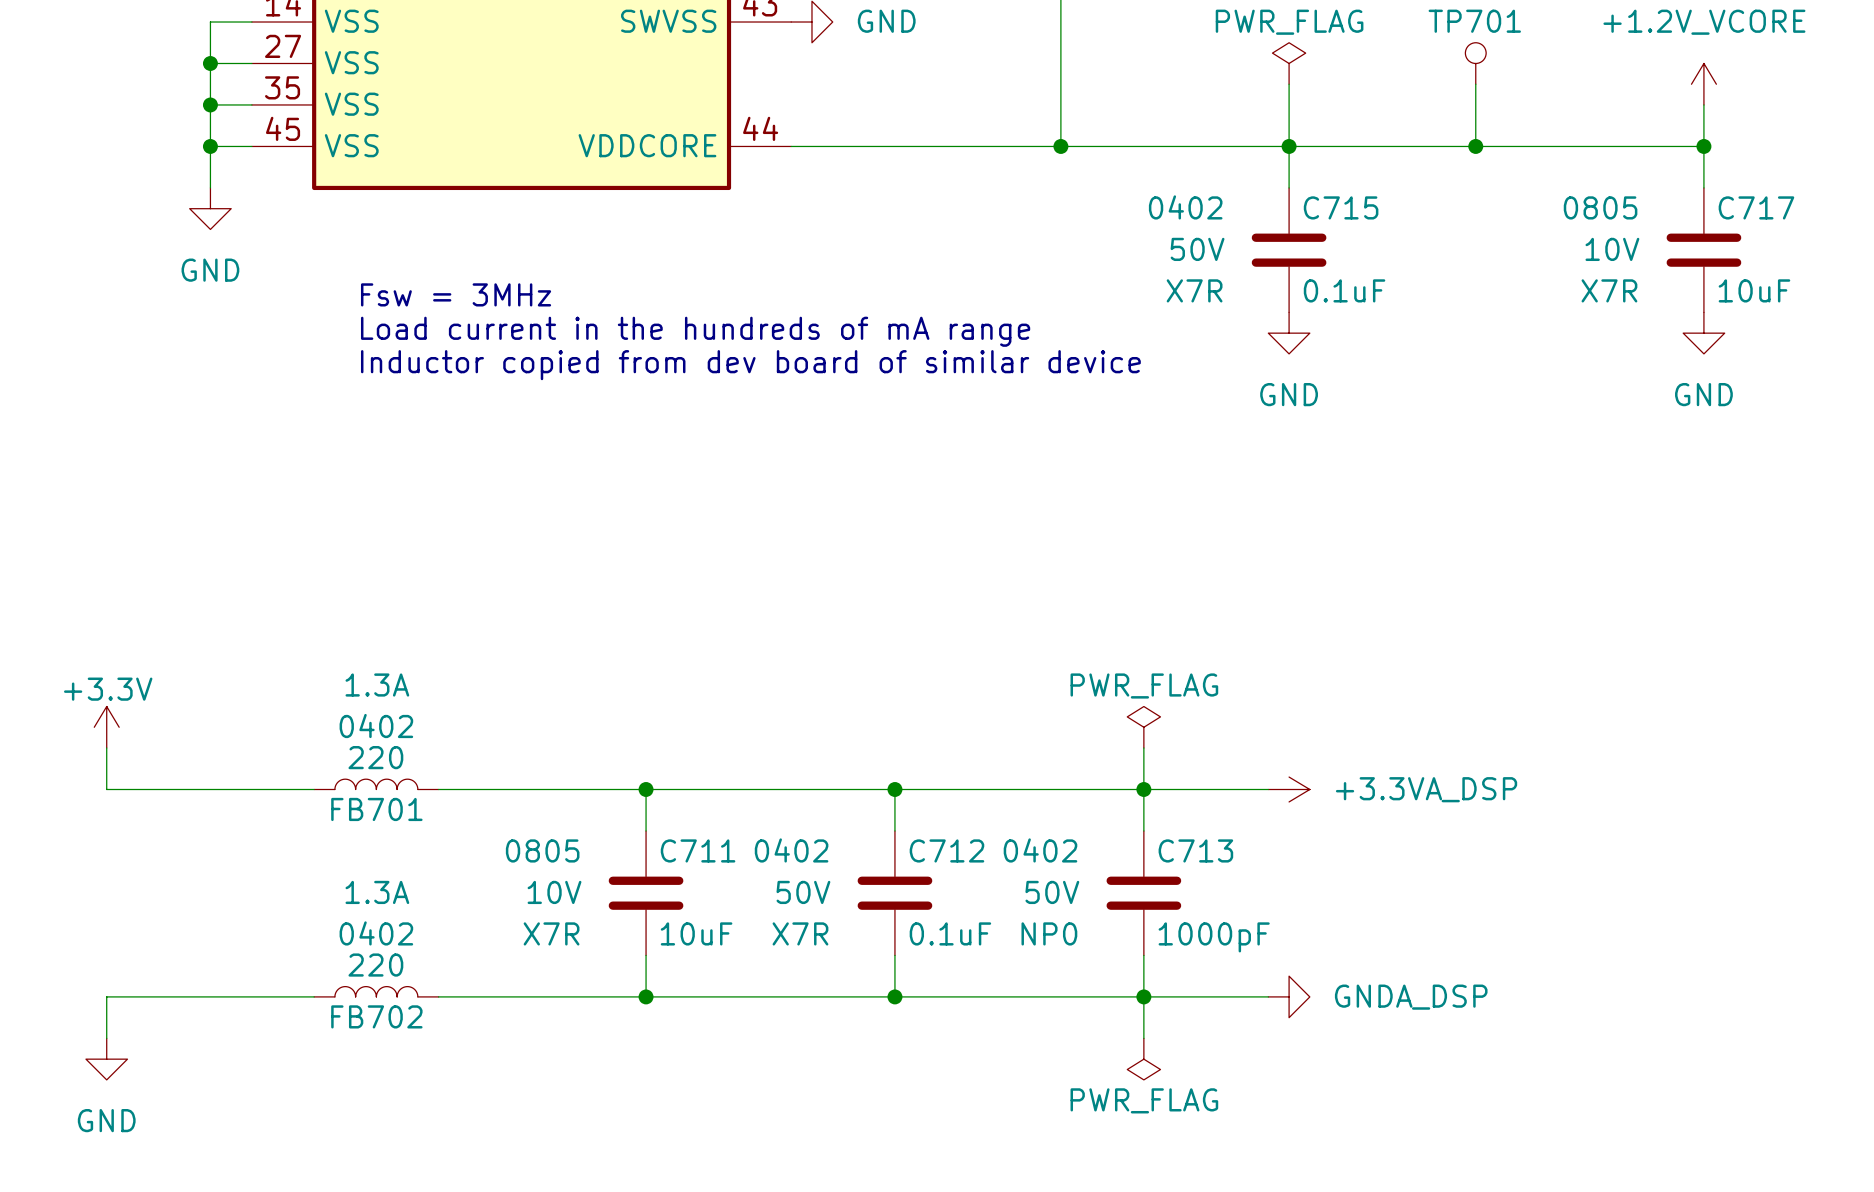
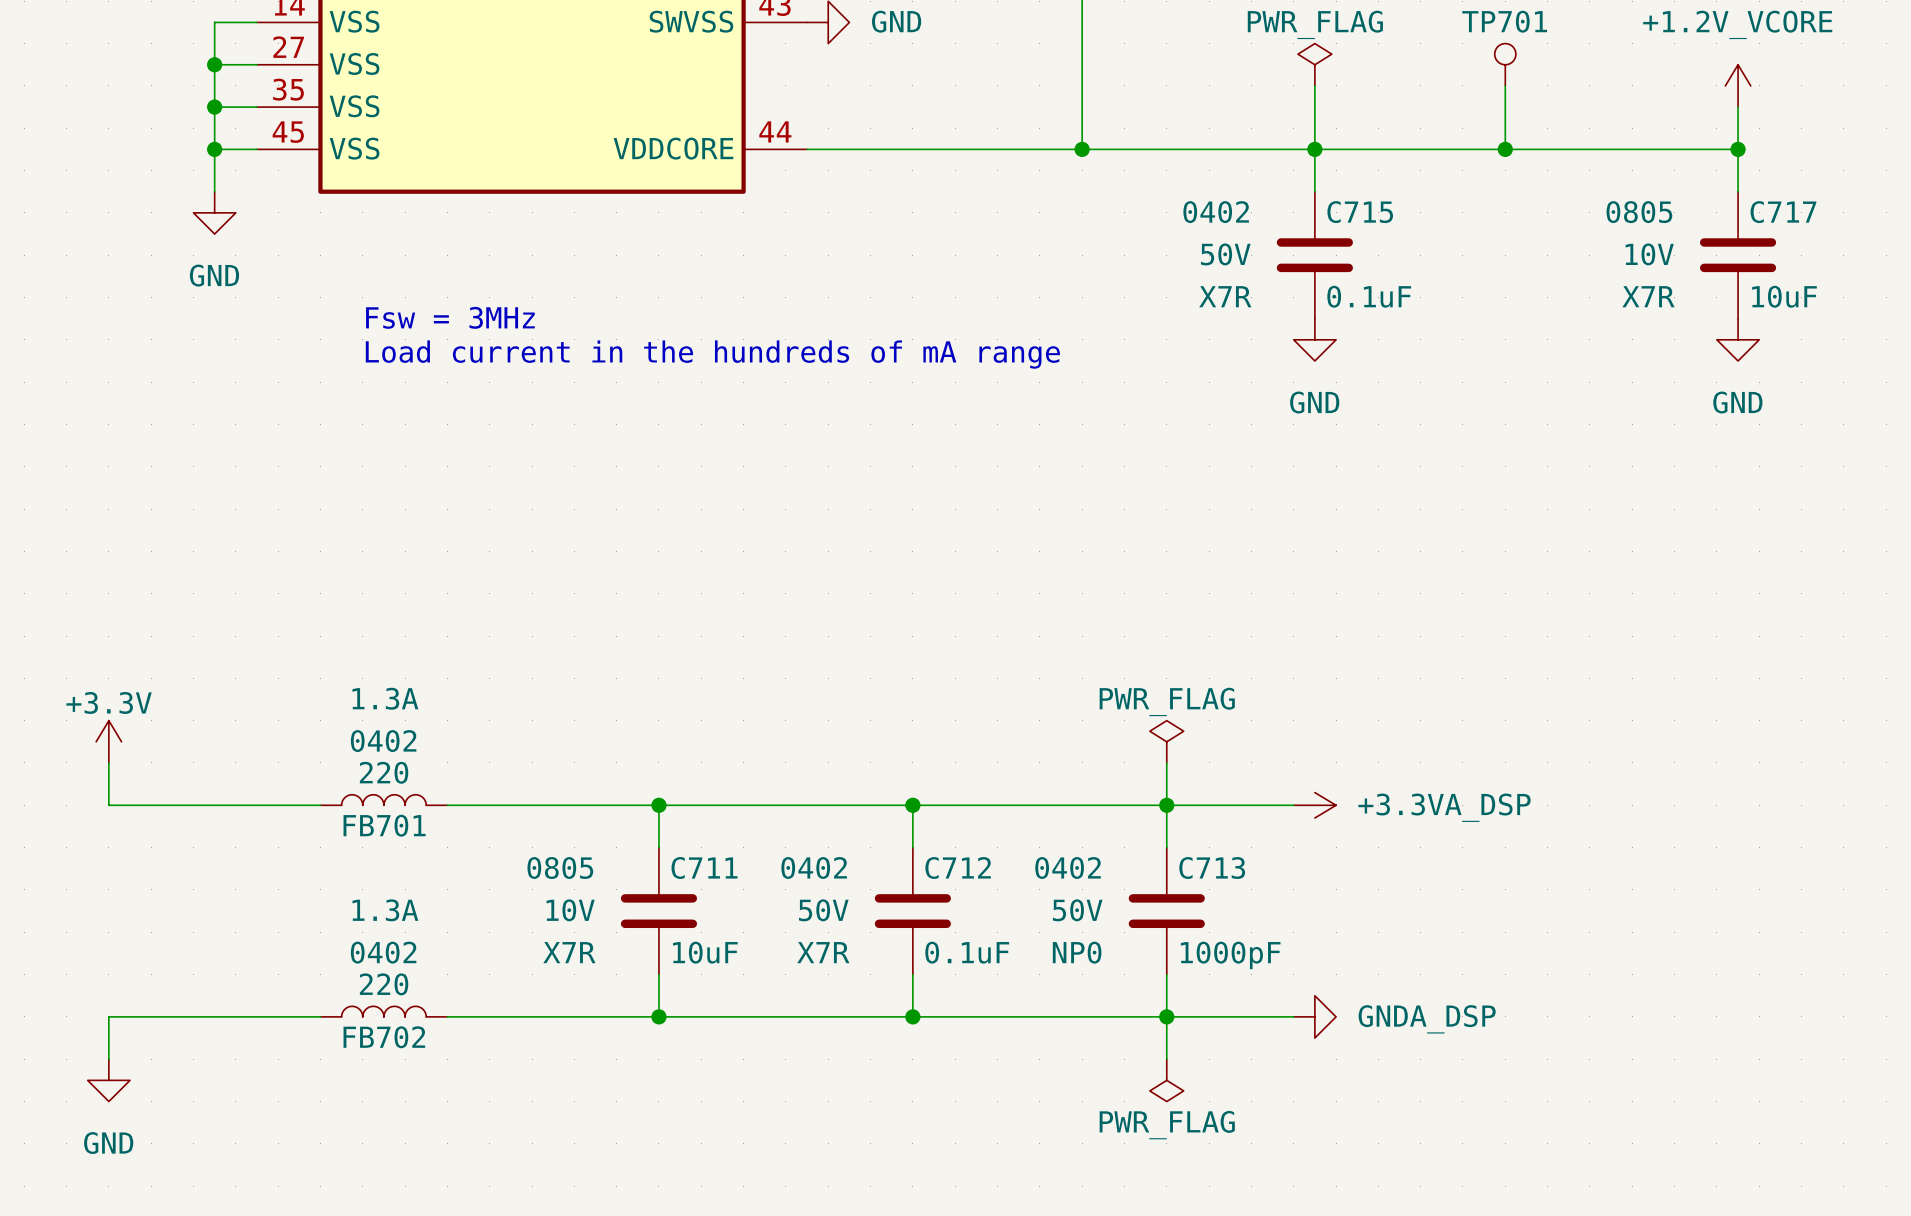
text position: Fsw = 3MHz (456, 294) -> Fsw = 3MHz (450, 317)
text position: Load current in the hundreds of mA range (695, 331) -> Load current in the hundreds of mA range (712, 354)
text: Inductor copied from dev board of similar device (750, 365) -> none

